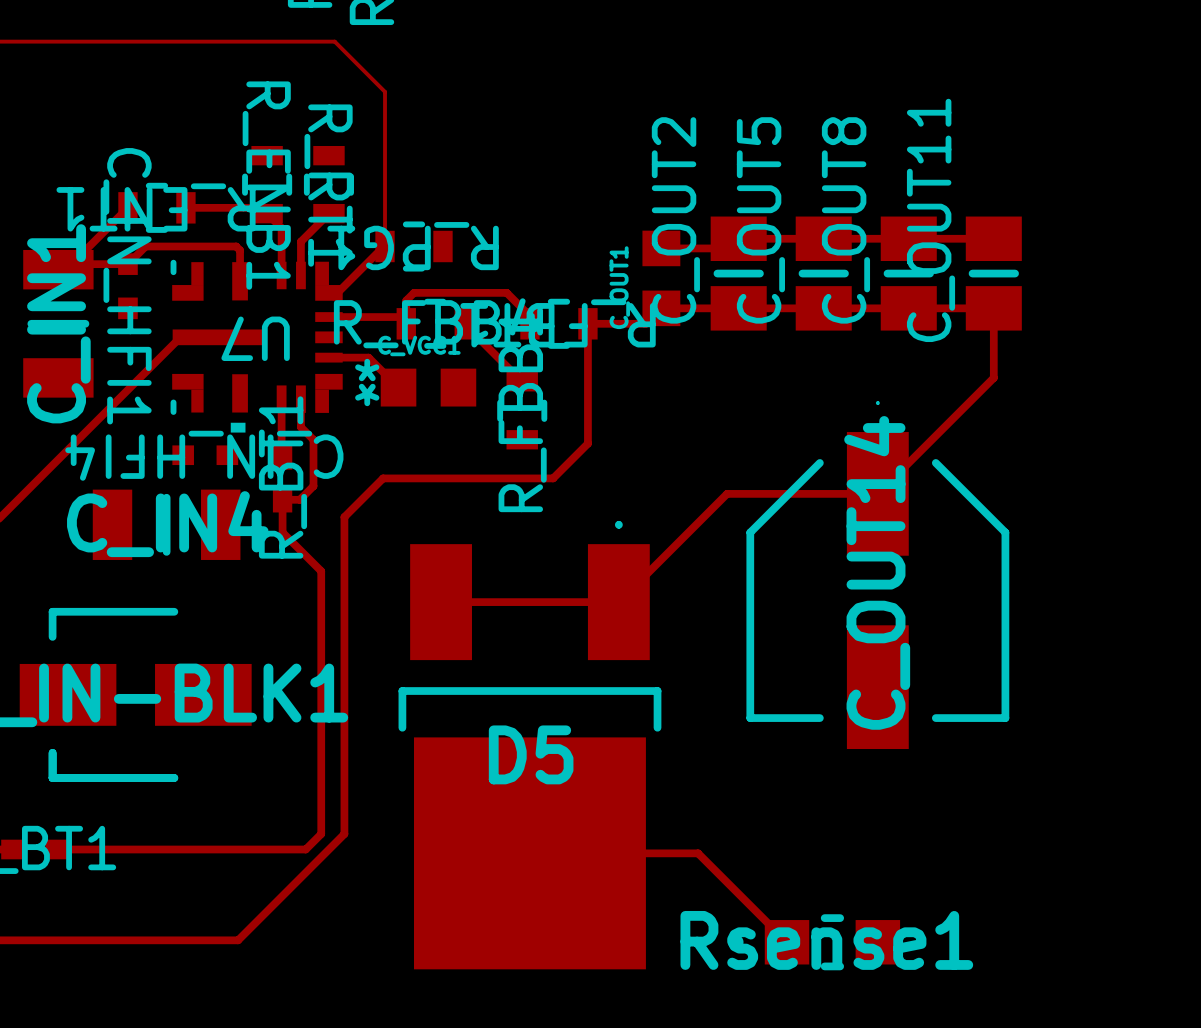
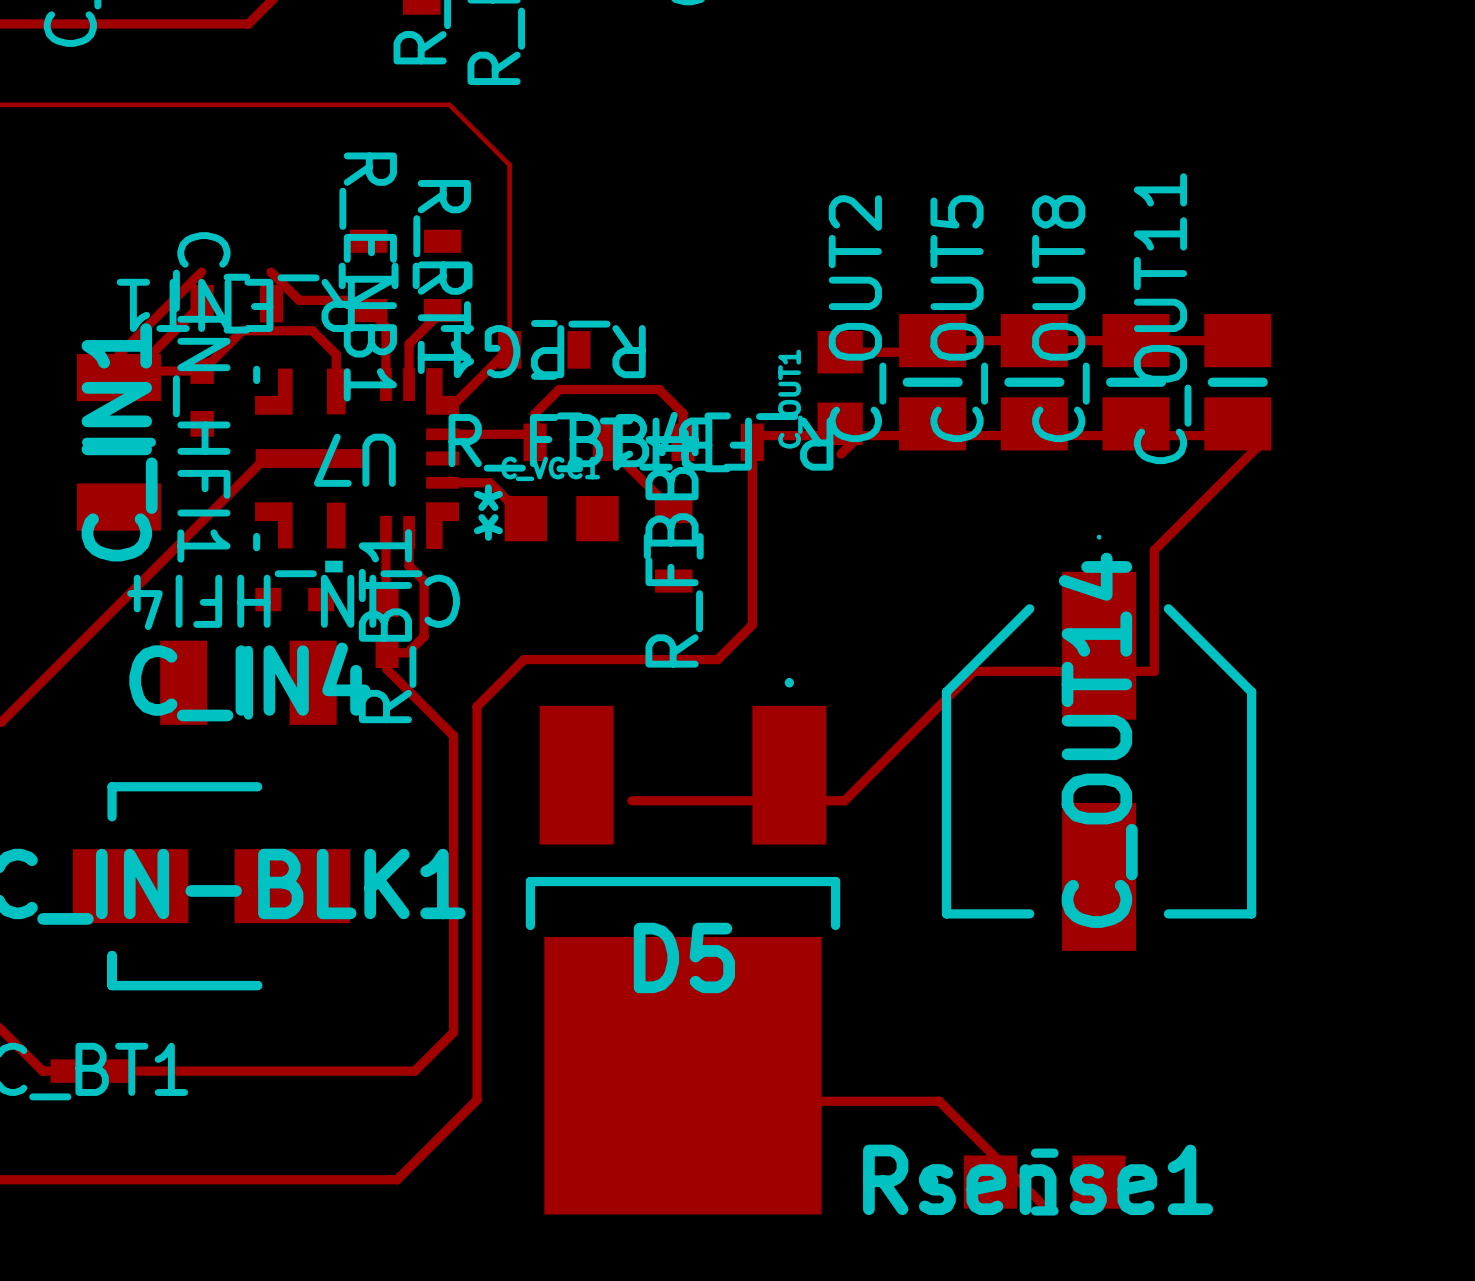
top track: none -> (201, 272) (118, 354) (118, 377)
top track: (185, 207) (261, 207) (281, 228) -> (270, 272) (299, 300) (359, 300) (385, 327)
top track: (145, 246) (236, 246) -> (223, 349) (242, 330) (312, 330) (331, 349)
top track: (406, 300) (414, 292) (506, 292) (529, 316) -> (535, 413) (559, 389) (659, 389) (683, 413) (683, 433)
top track: none -> (859, 435) (841, 454)
top track: (587, 323) (645, 323) (661, 308) (993, 308) (993, 377) (877, 493) (727, 493) (618, 602) (441, 602) -> (752, 442) (759, 435) (1257, 435) (1257, 447) (1154, 550) (1154, 671) (974, 671) (844, 800) (631, 800)
top track: (587, 443) (553, 478) (383, 478) (344, 517) (344, 834) (238, 940) -> (752, 585) (752, 625) (717, 659) (524, 659) (477, 706) (477, 1099) (397, 1179) (333, 1179)
top track: (282, 513) (282, 532) (321, 571) (321, 834) -> (387, 669) (453, 735) (453, 1032) (433, 1052)
top track: (529, 853) (698, 853) (787, 942) -> (738, 1101) (939, 1101) (1045, 1207)

